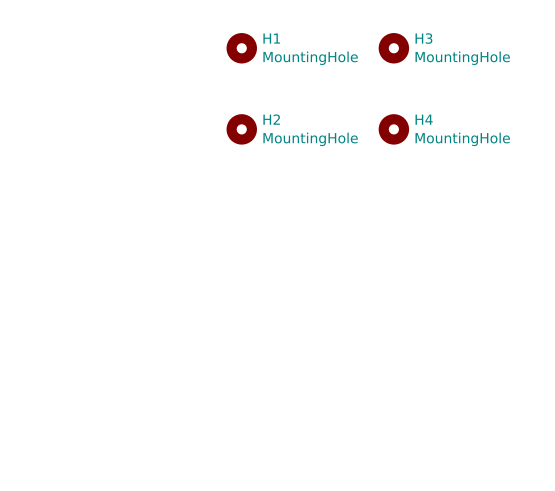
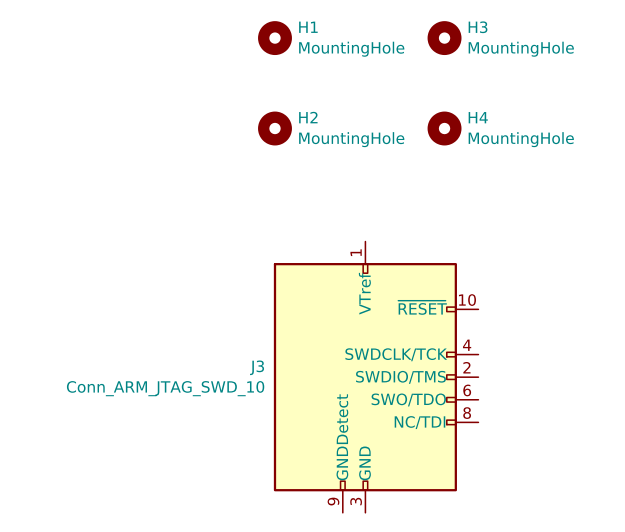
J3: none -> Conn_ARM_JTAG_SWD_10 (376, 377)

